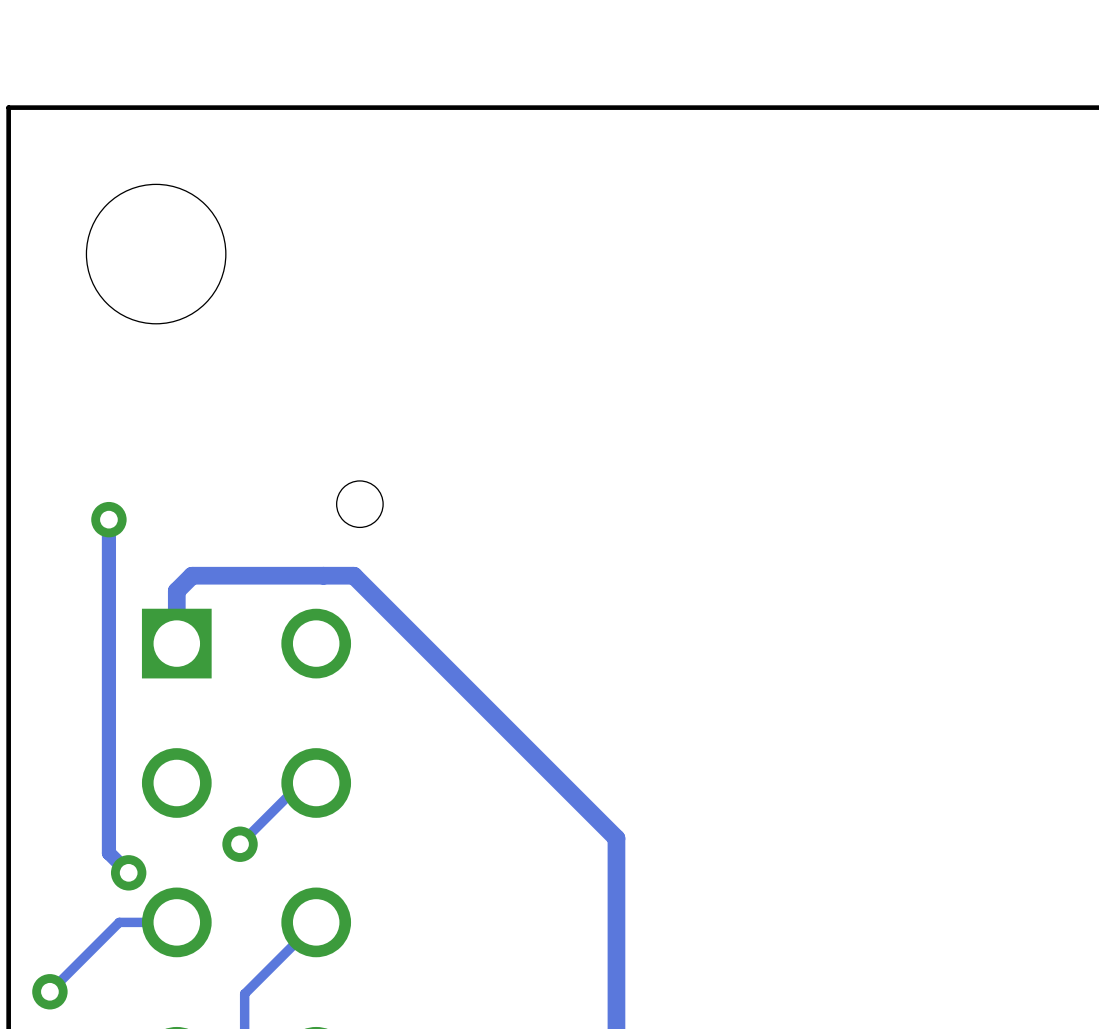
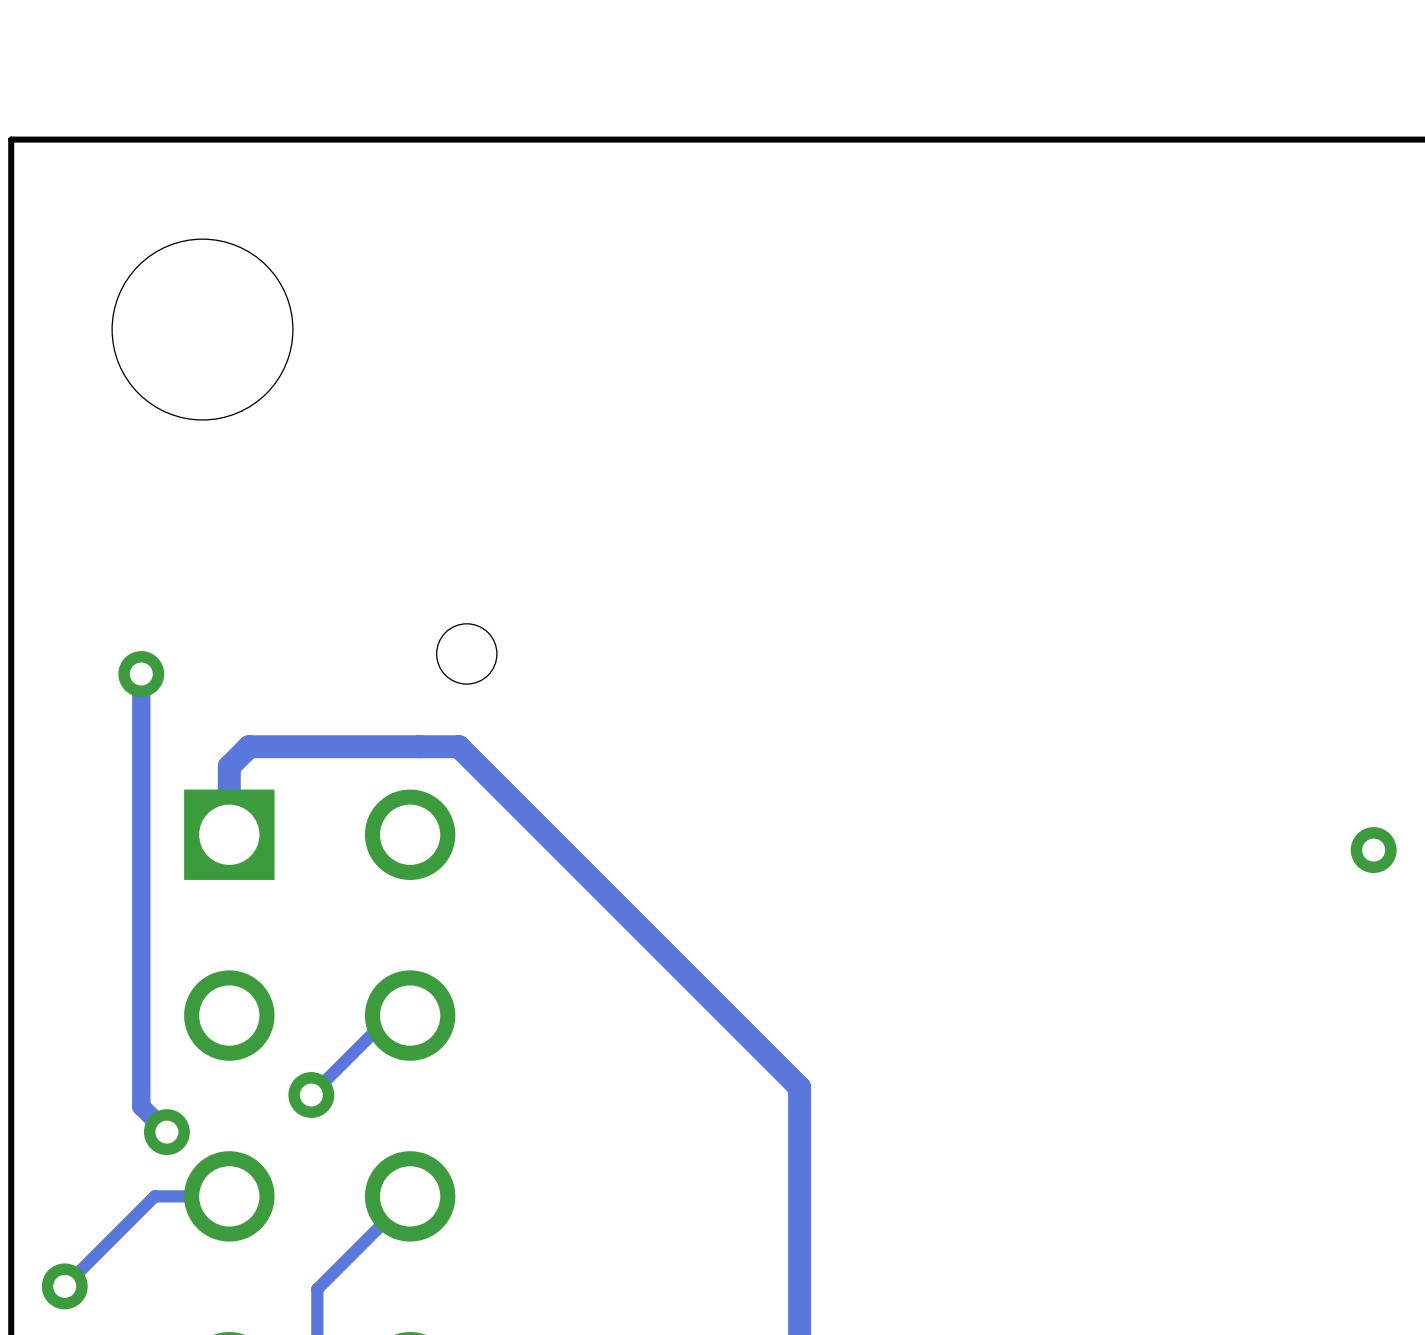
via: none -> (1373, 850)

